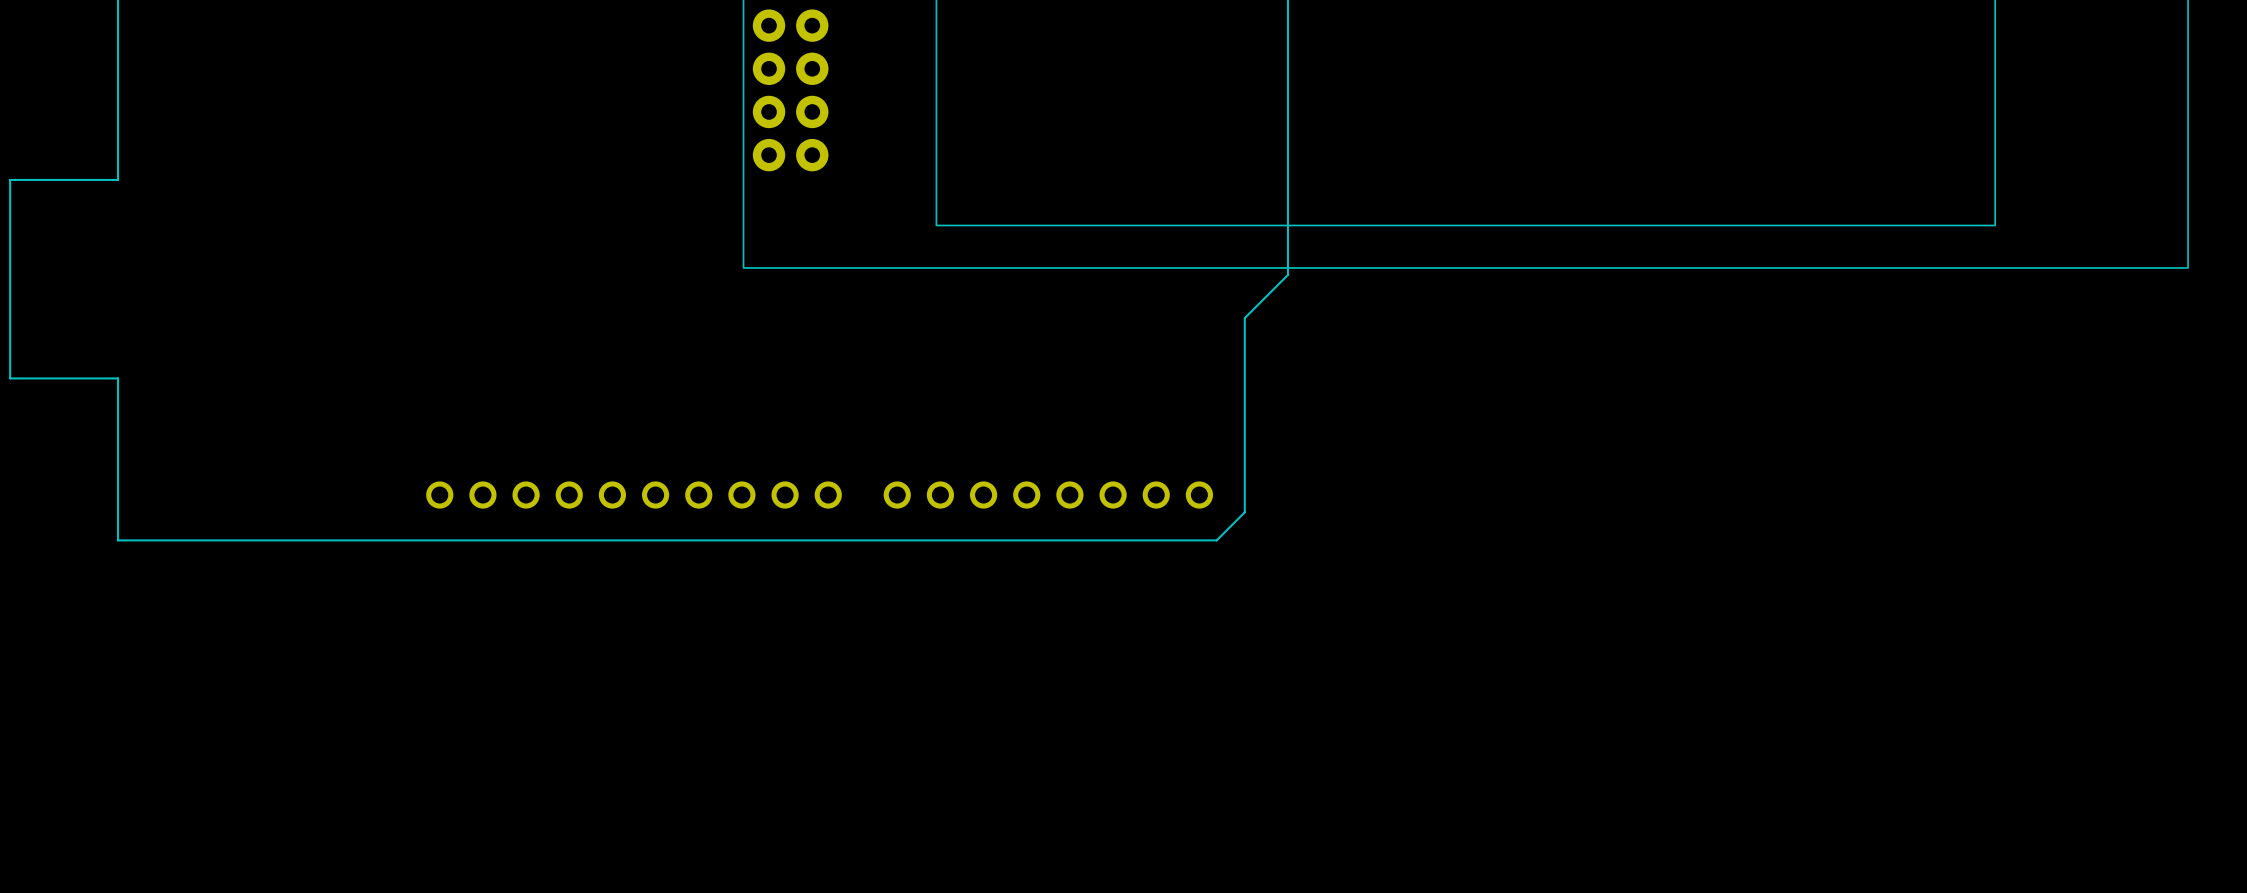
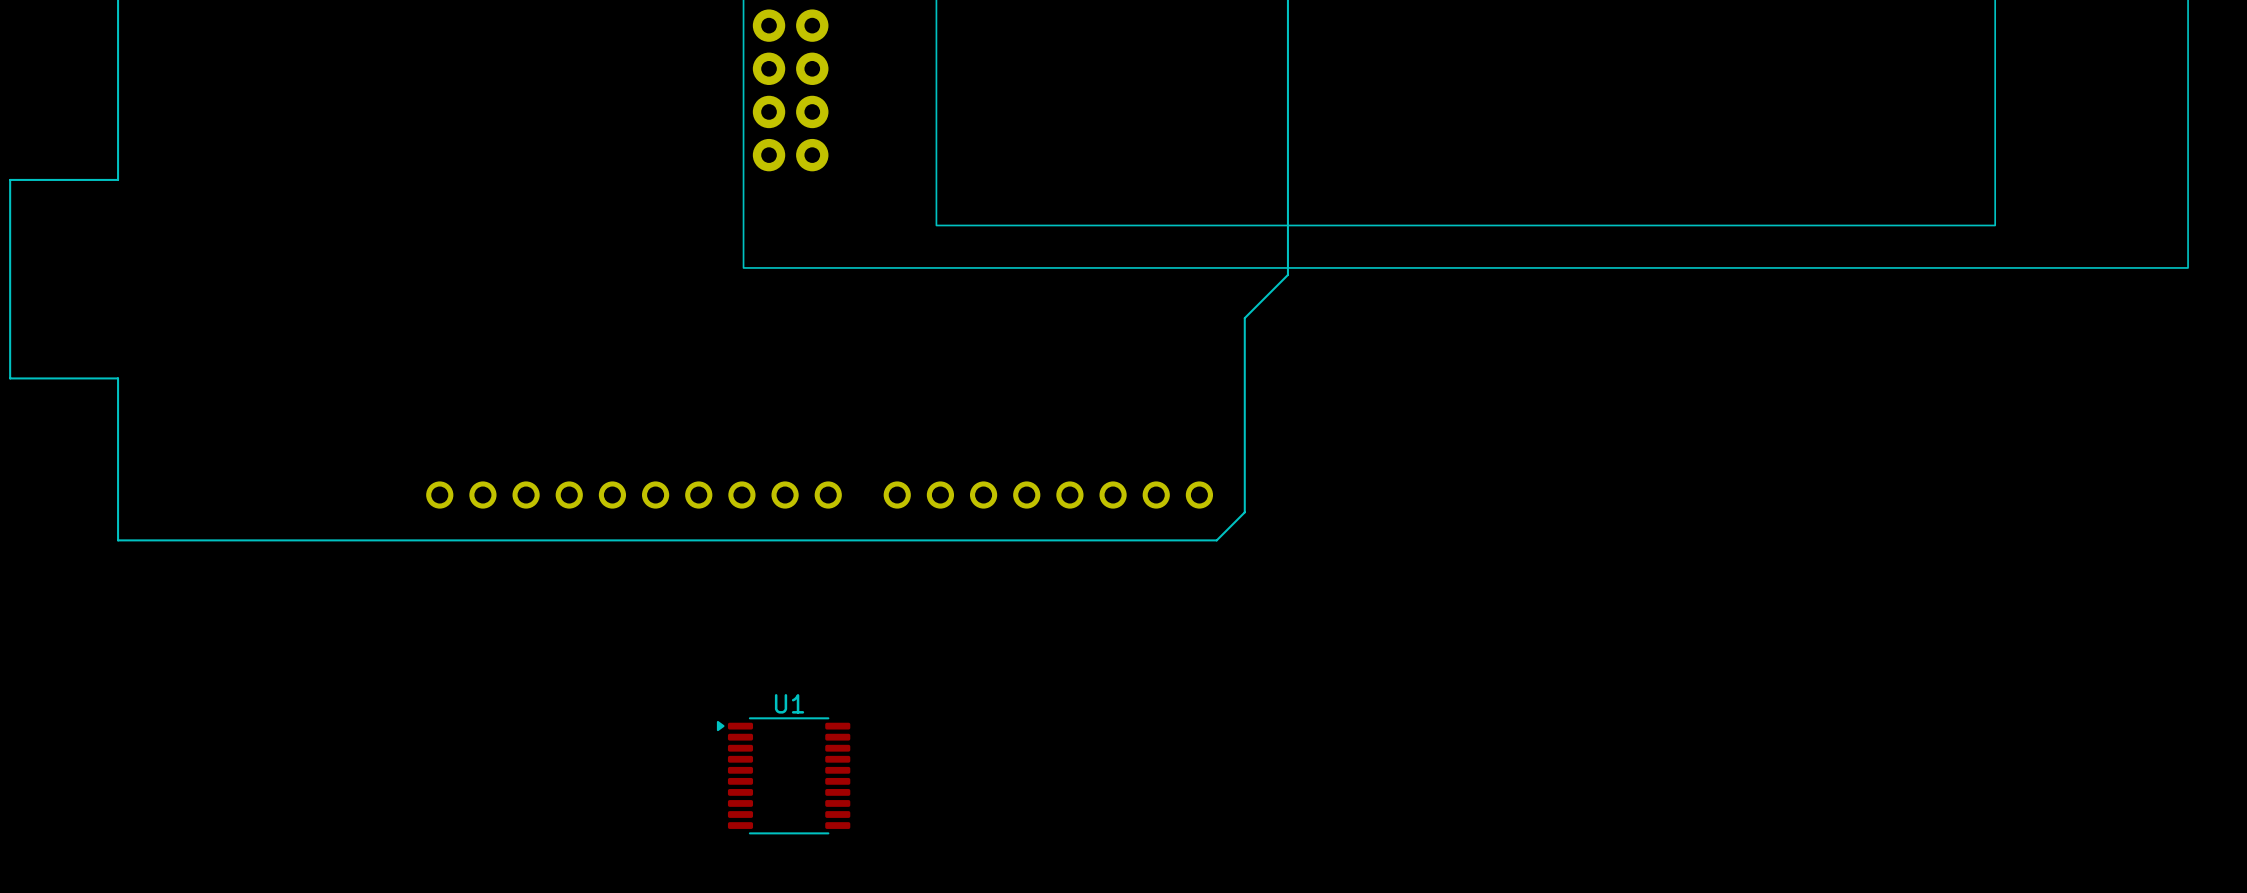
U1: none -> (783, 775)

